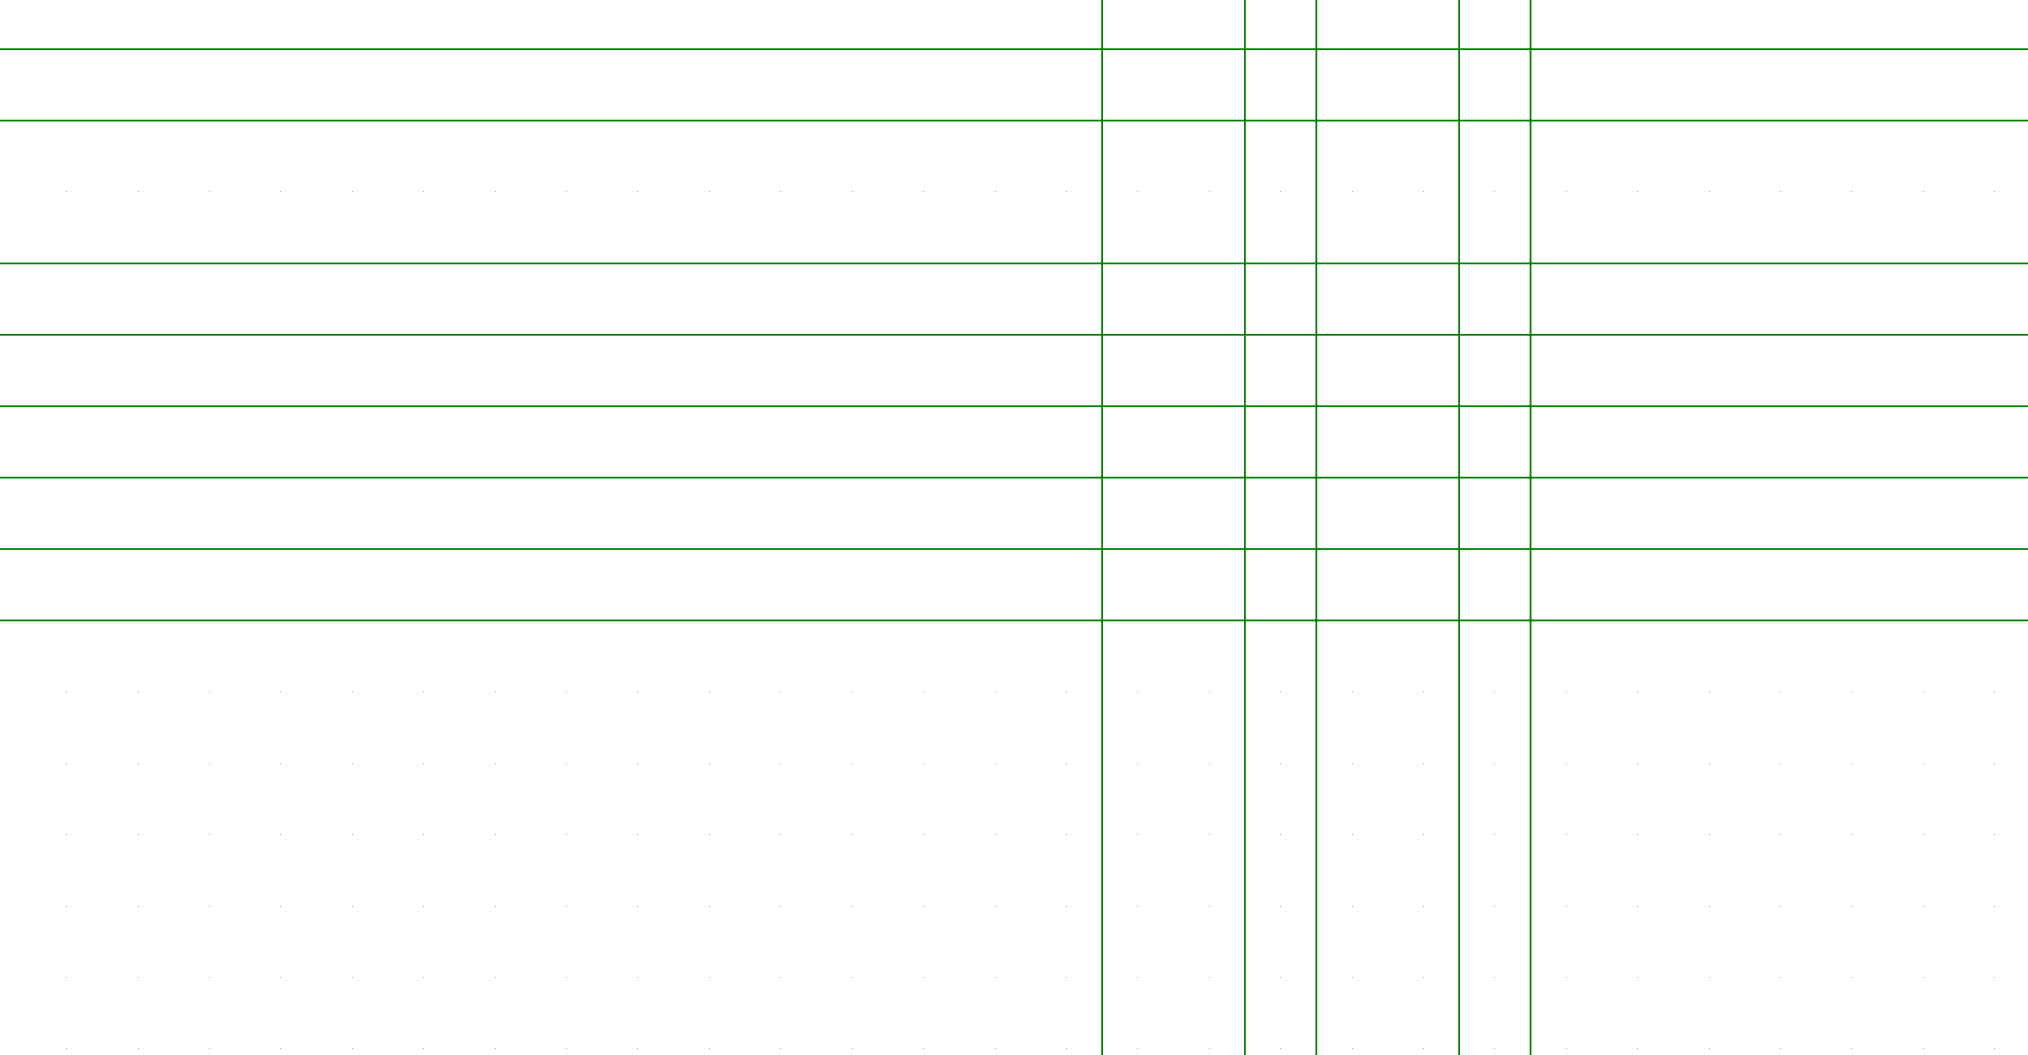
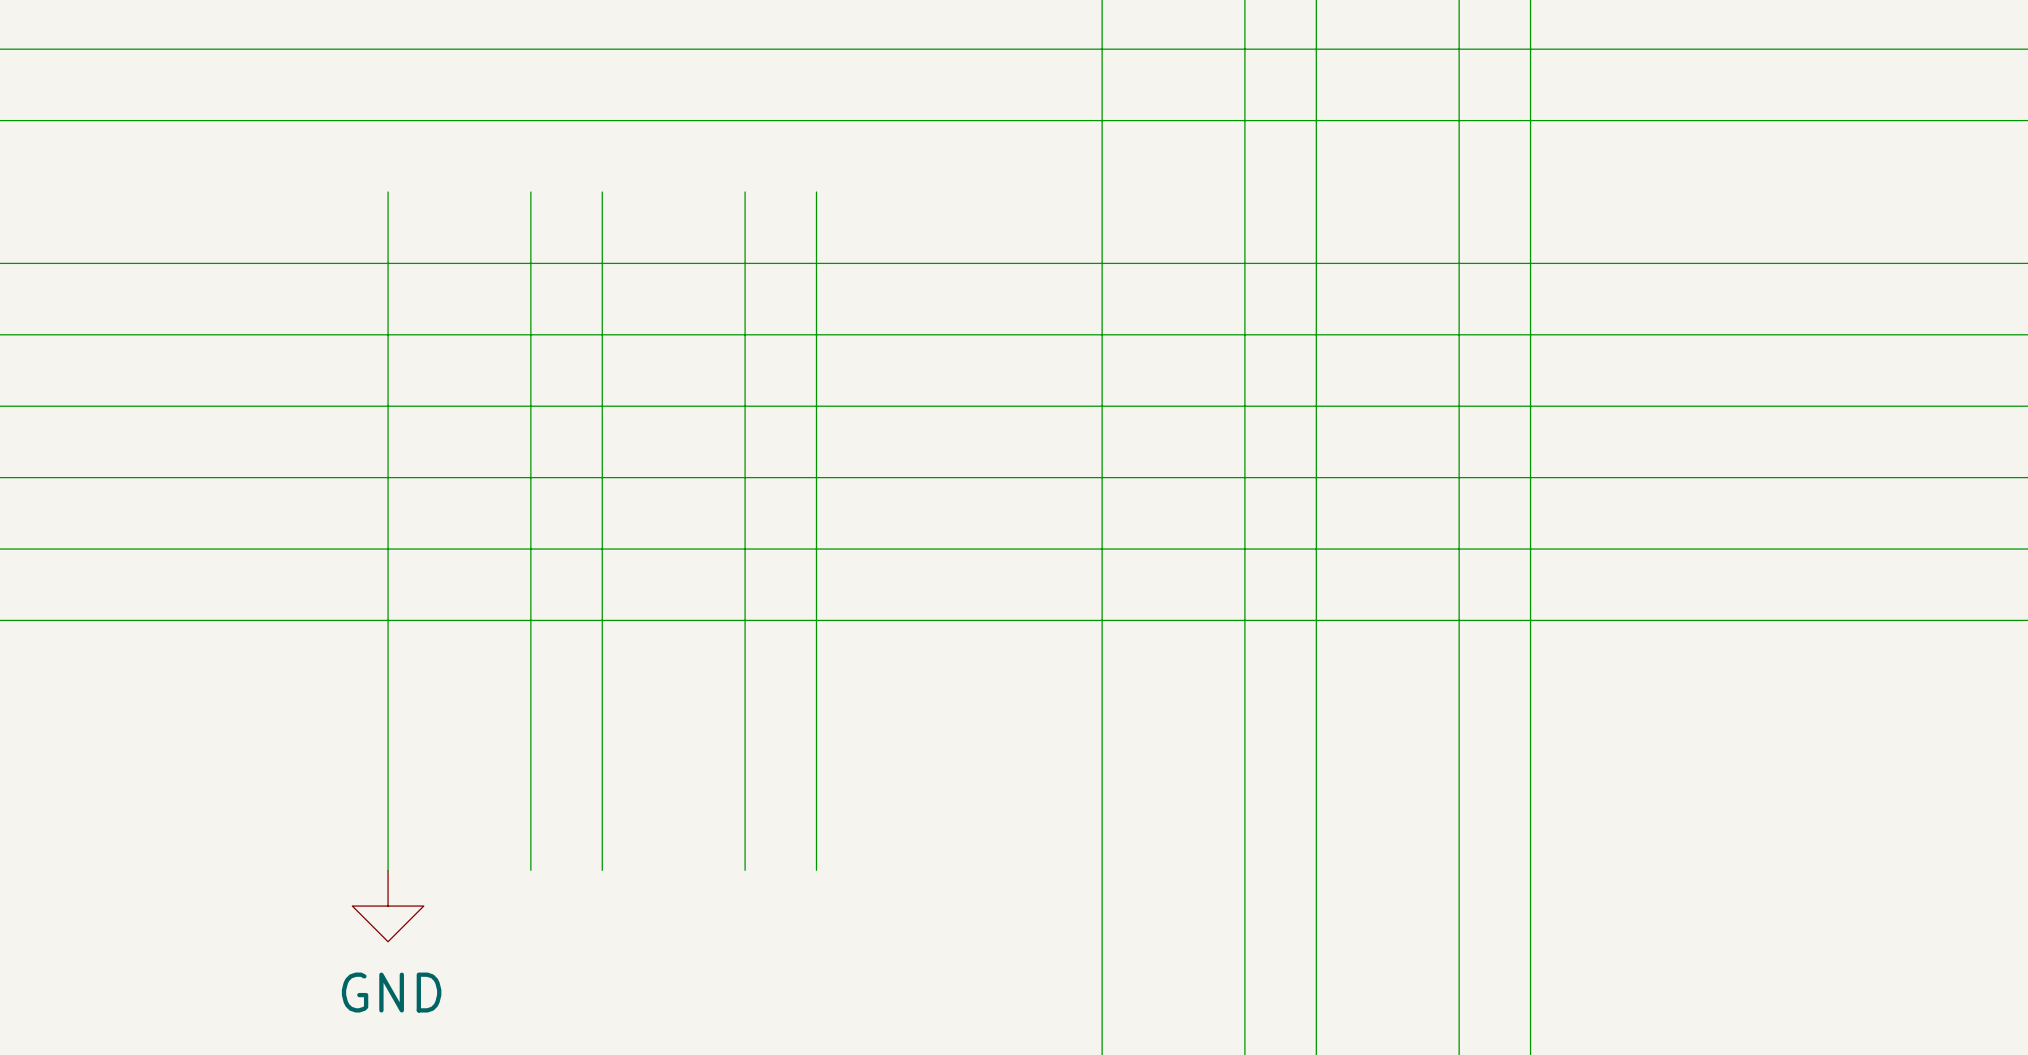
wire: none -> (388, 191) (388, 870)
wire: none -> (530, 191) (530, 870)
wire: none -> (602, 191) (602, 870)
wire: none -> (745, 191) (745, 870)
wire: none -> (816, 191) (816, 870)
power symbol: none -> GND (388, 906)

